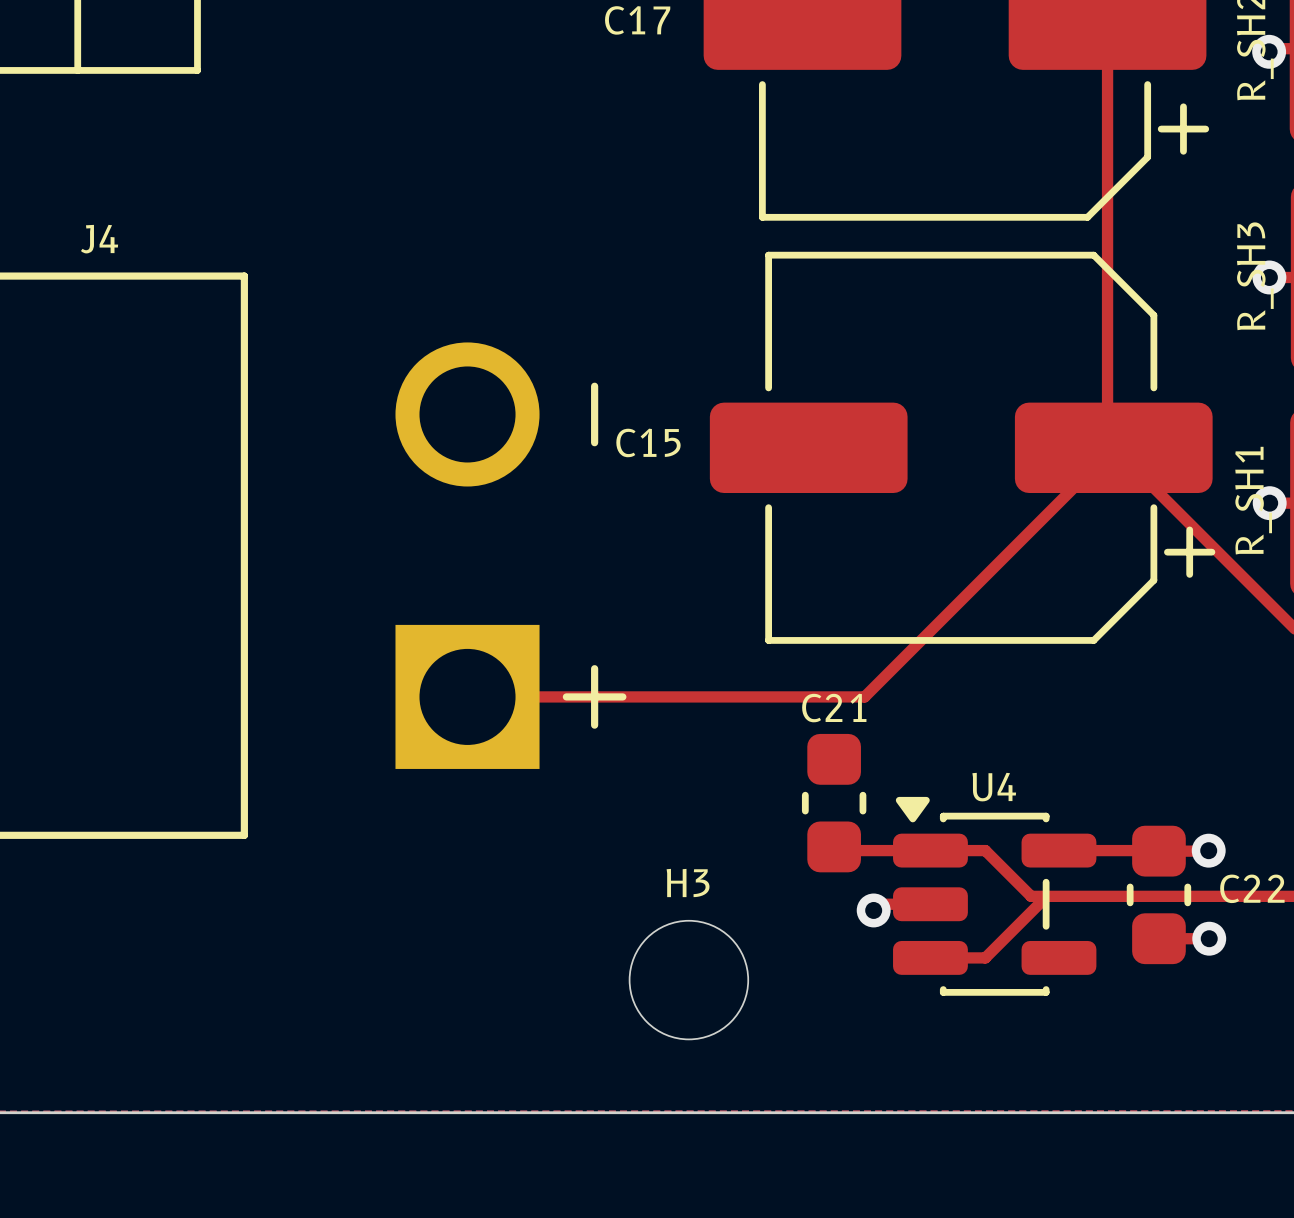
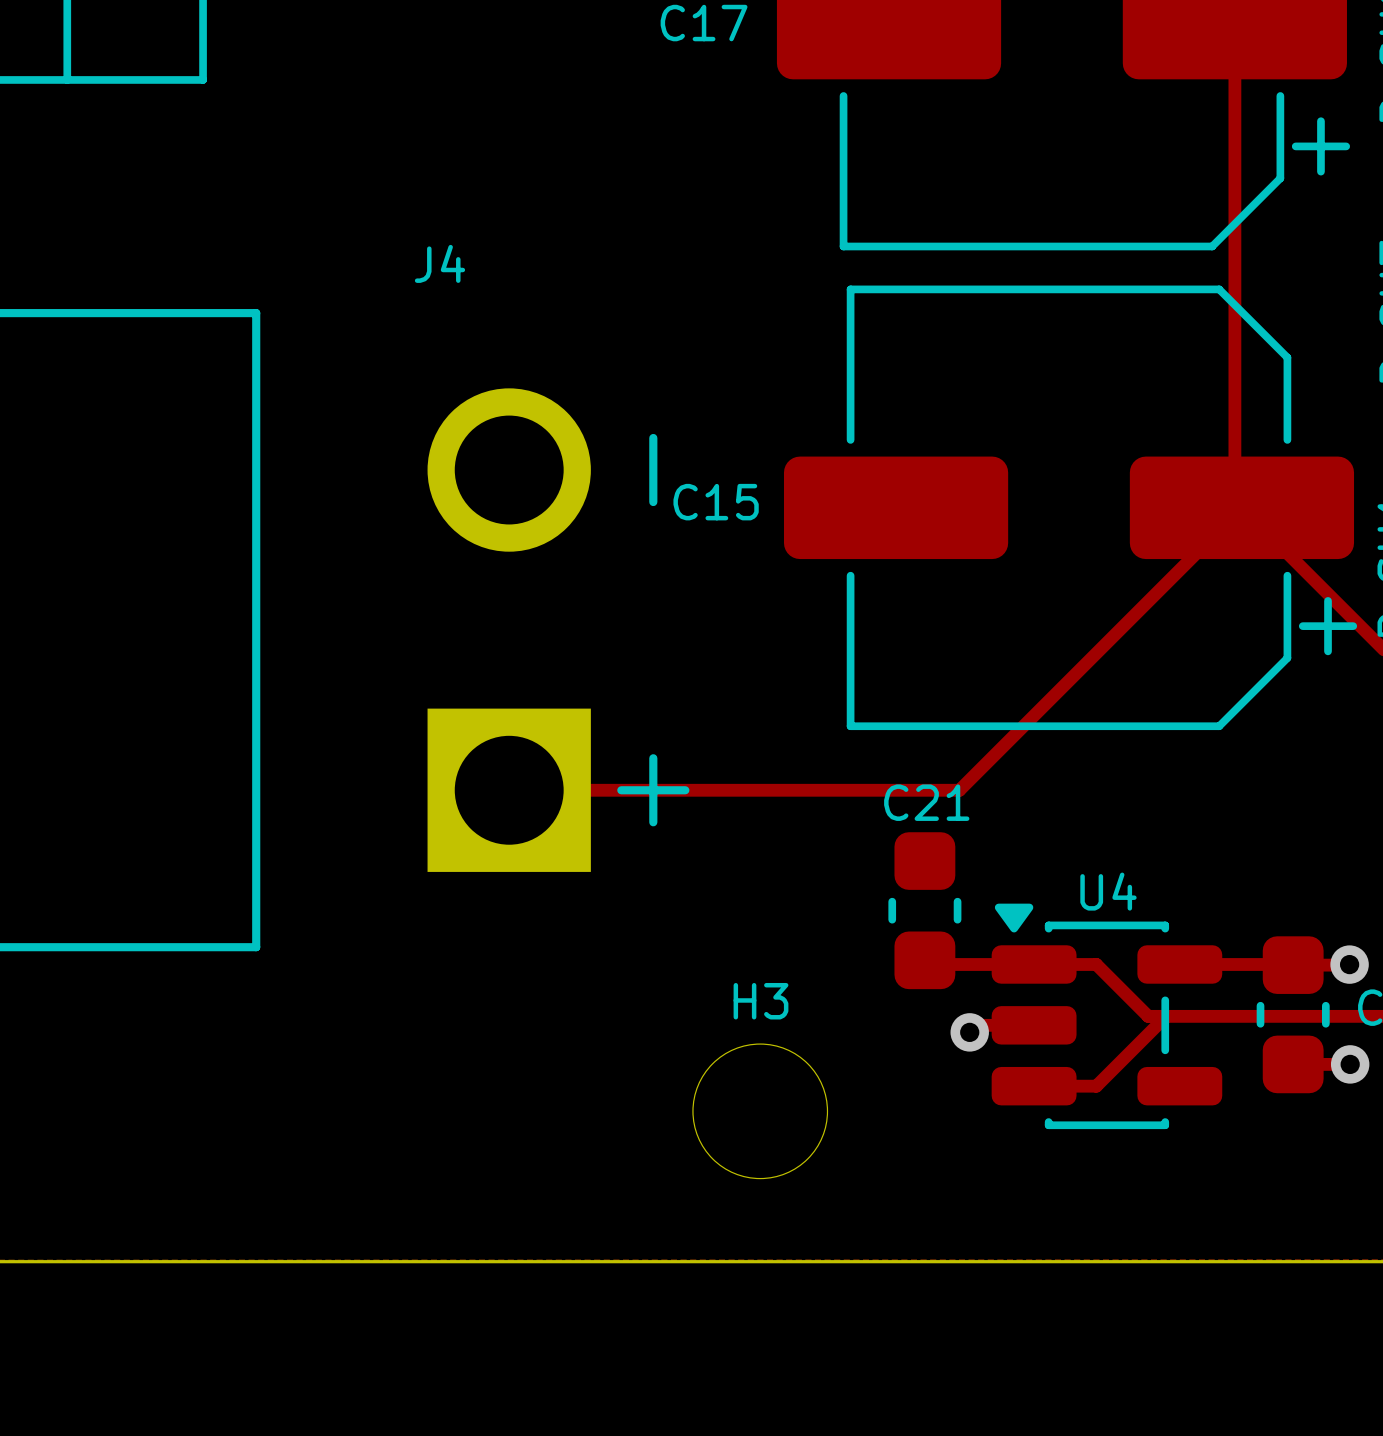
J4 name position: J4 (99, 239) -> J4 (439, 263)

